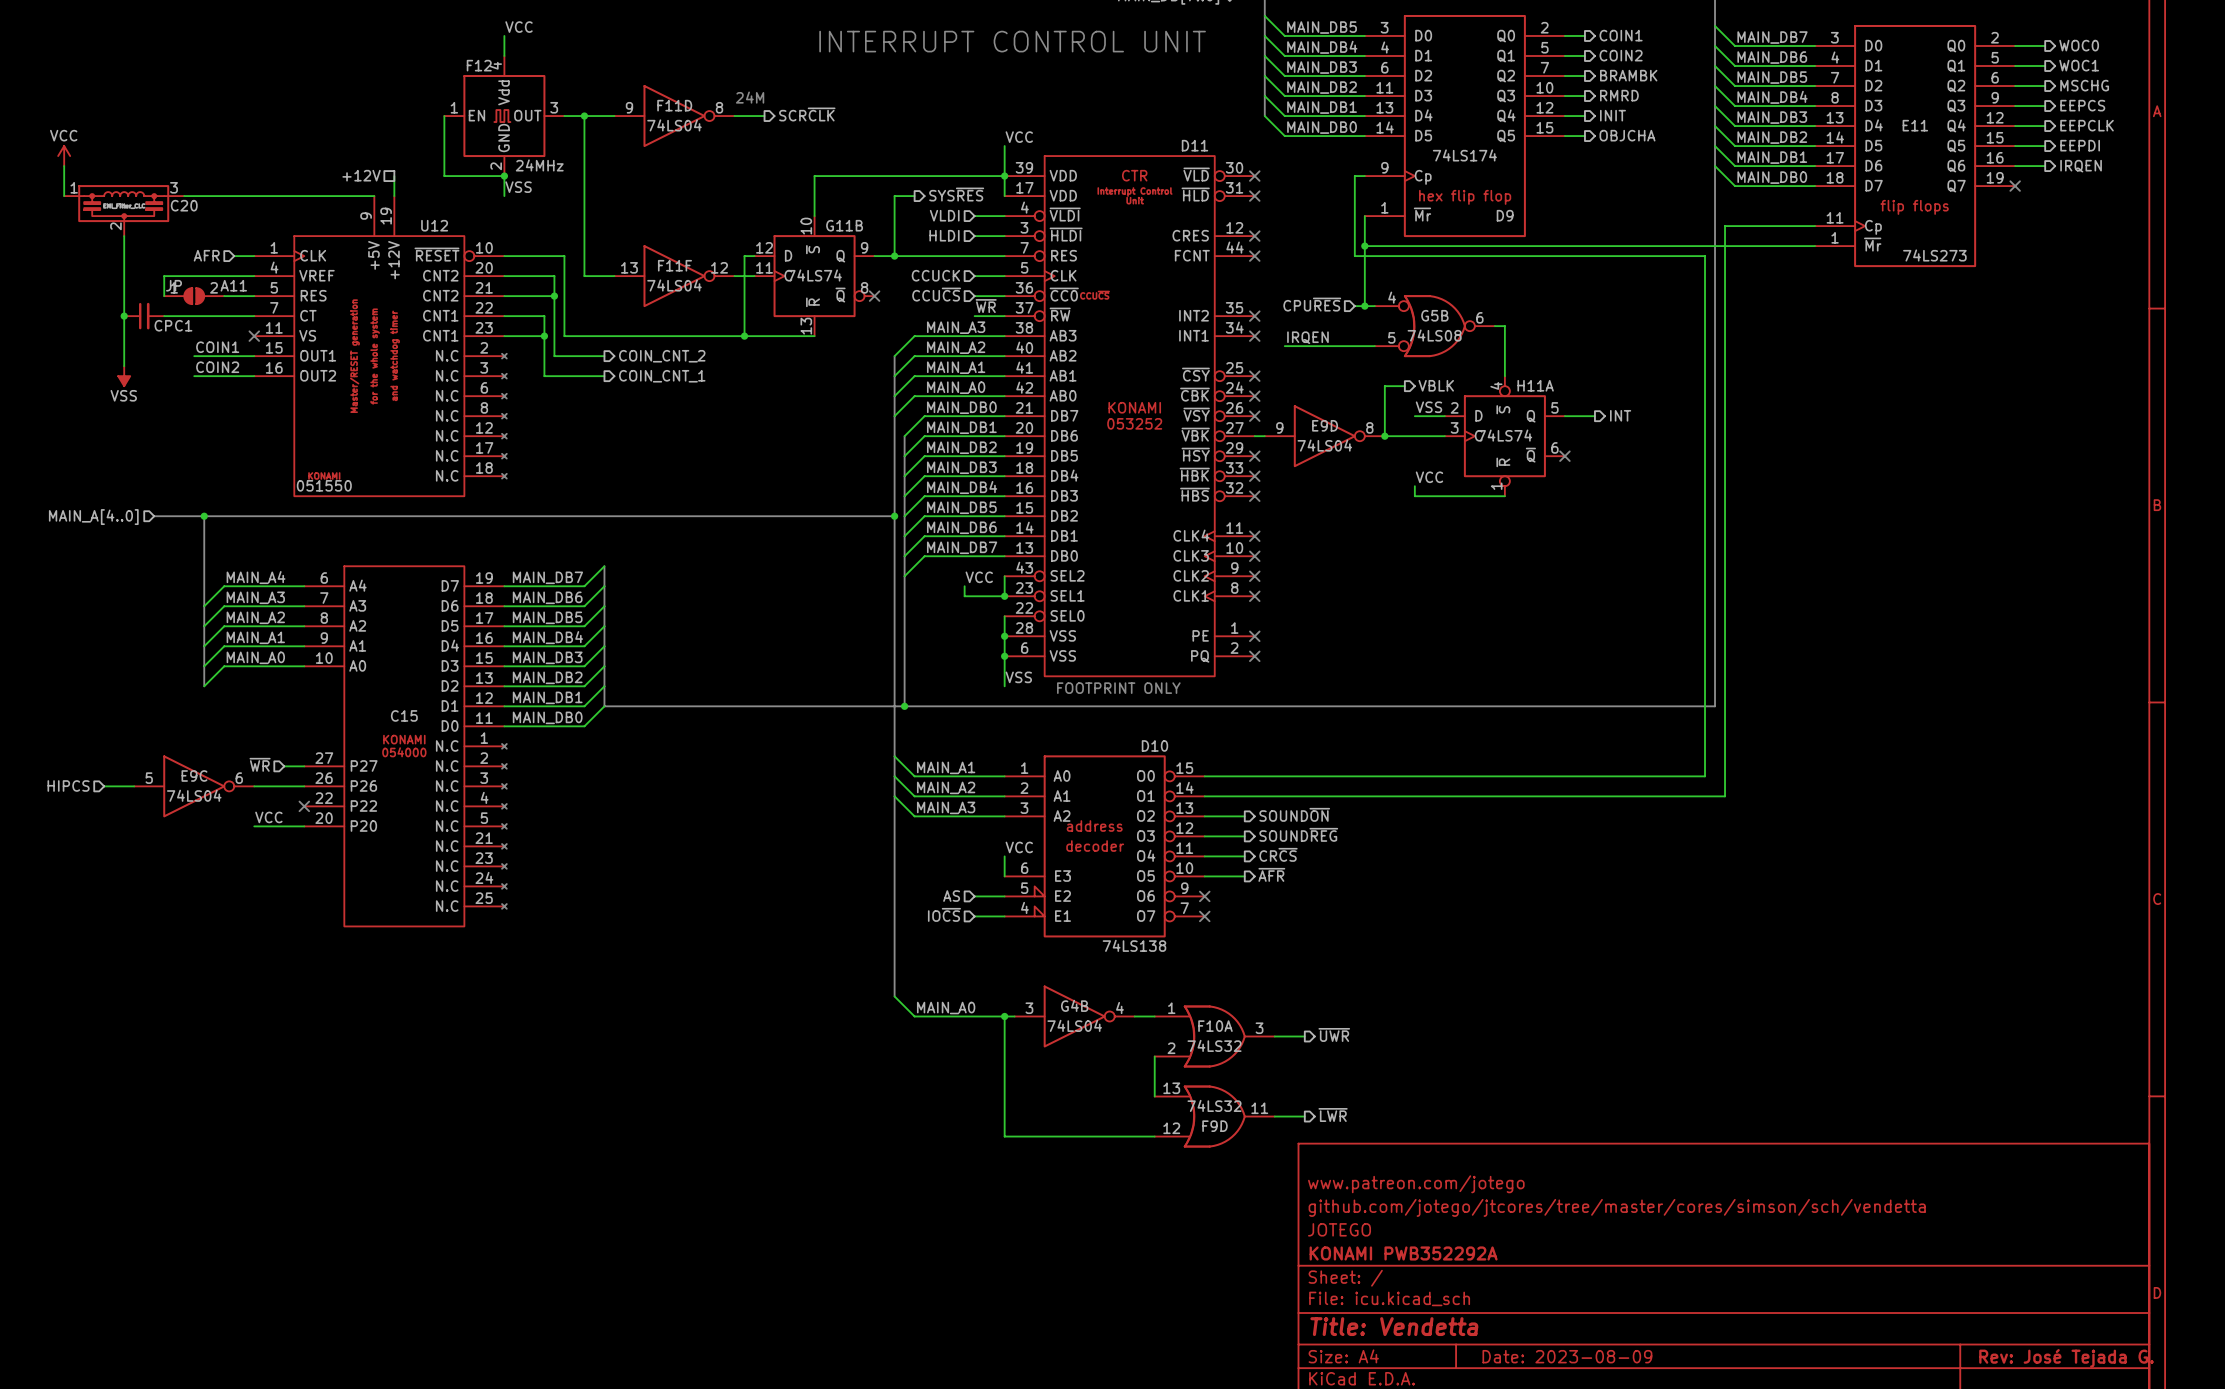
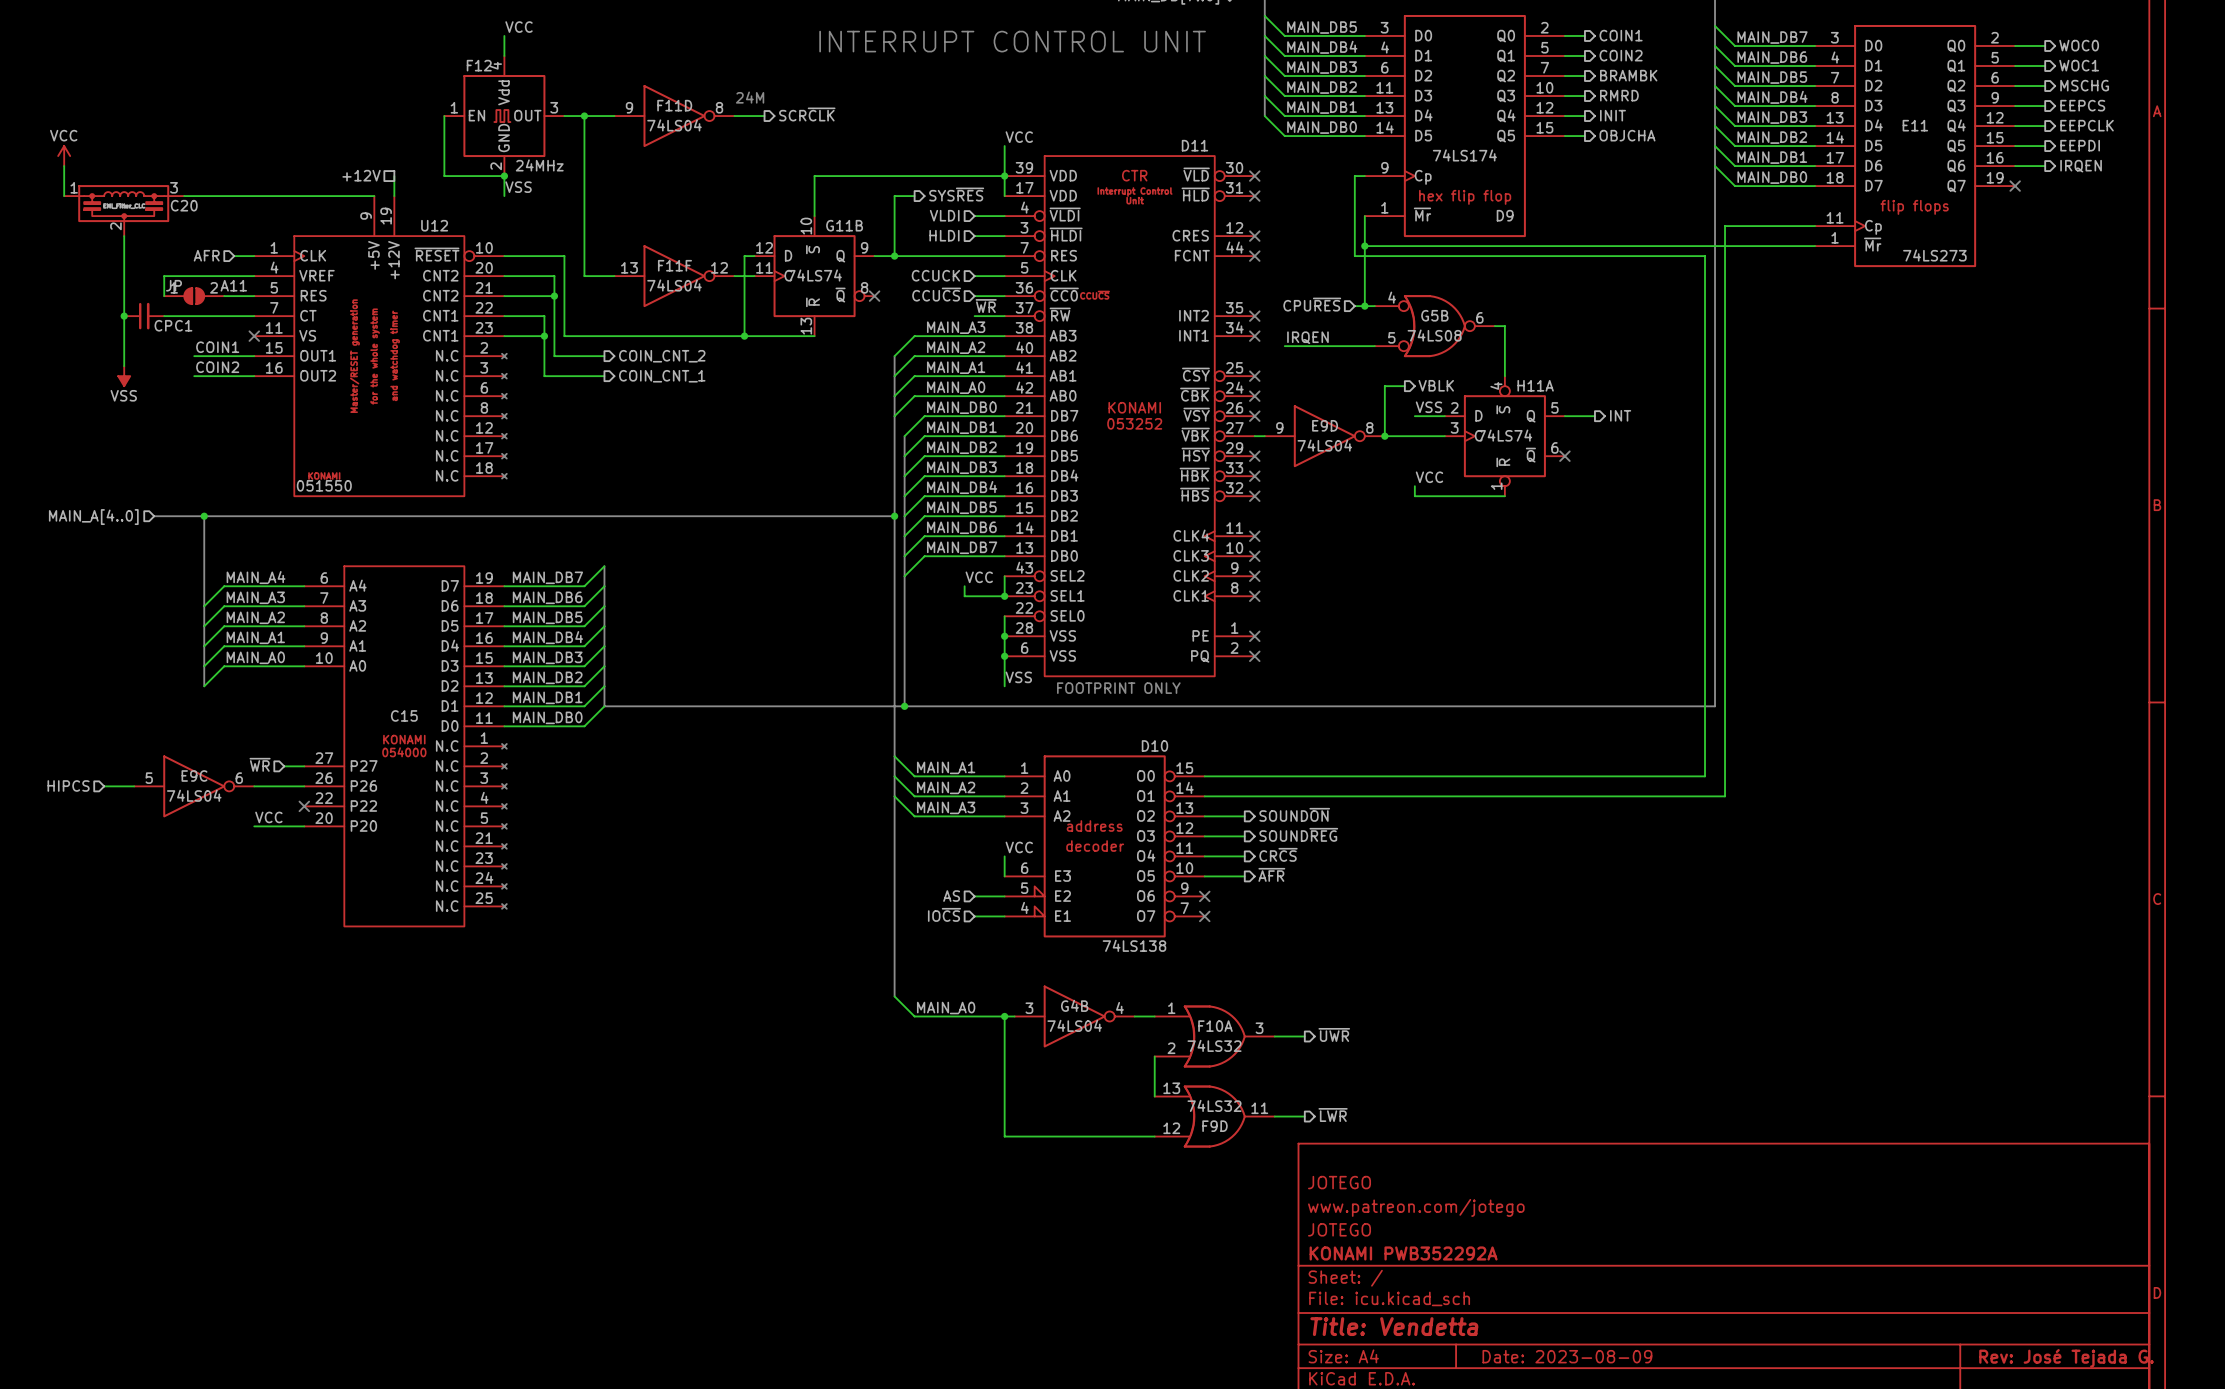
title block: www.patreon.com/jotego (1416, 1184) -> JOTEGO (1339, 1182)
title block: github.com/jotego/jtcores/tree/master/cores/simson/sch/vendetta (1617, 1207) -> www.patreon.com/jotego (1416, 1207)

